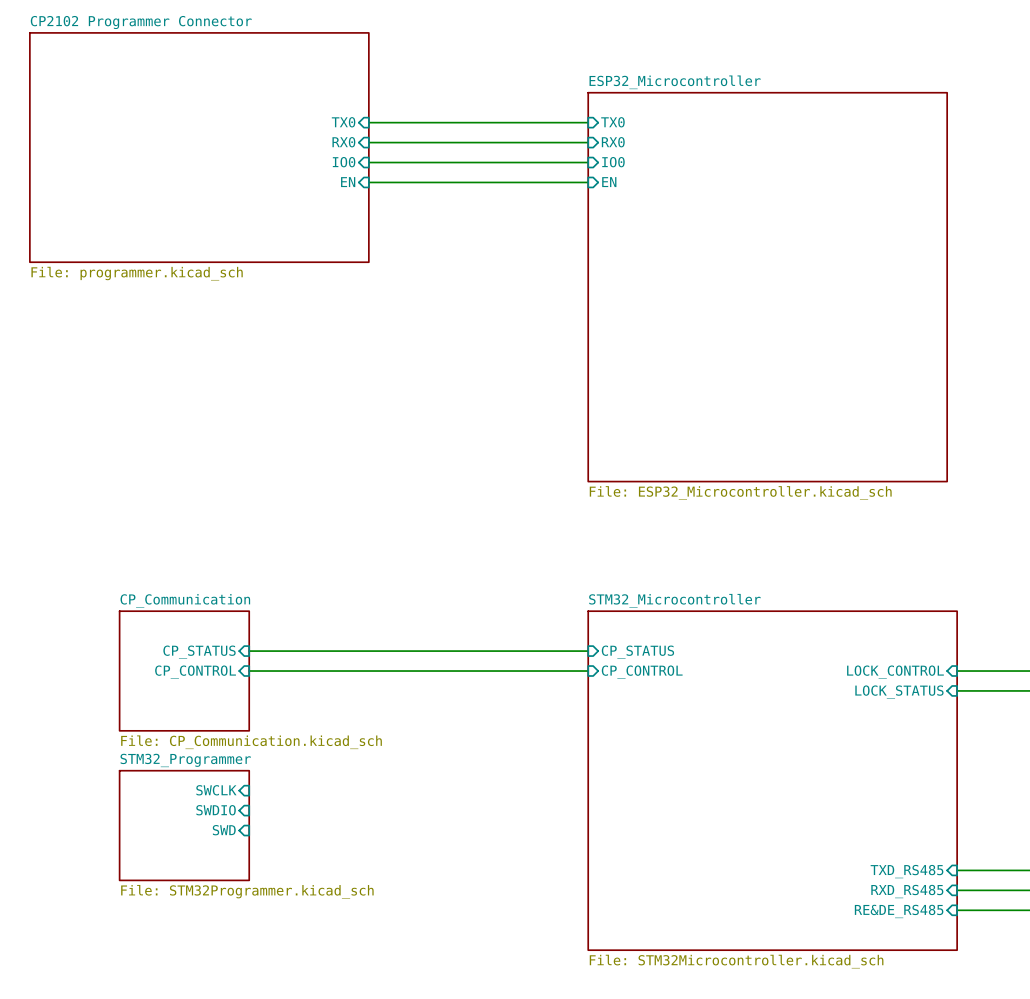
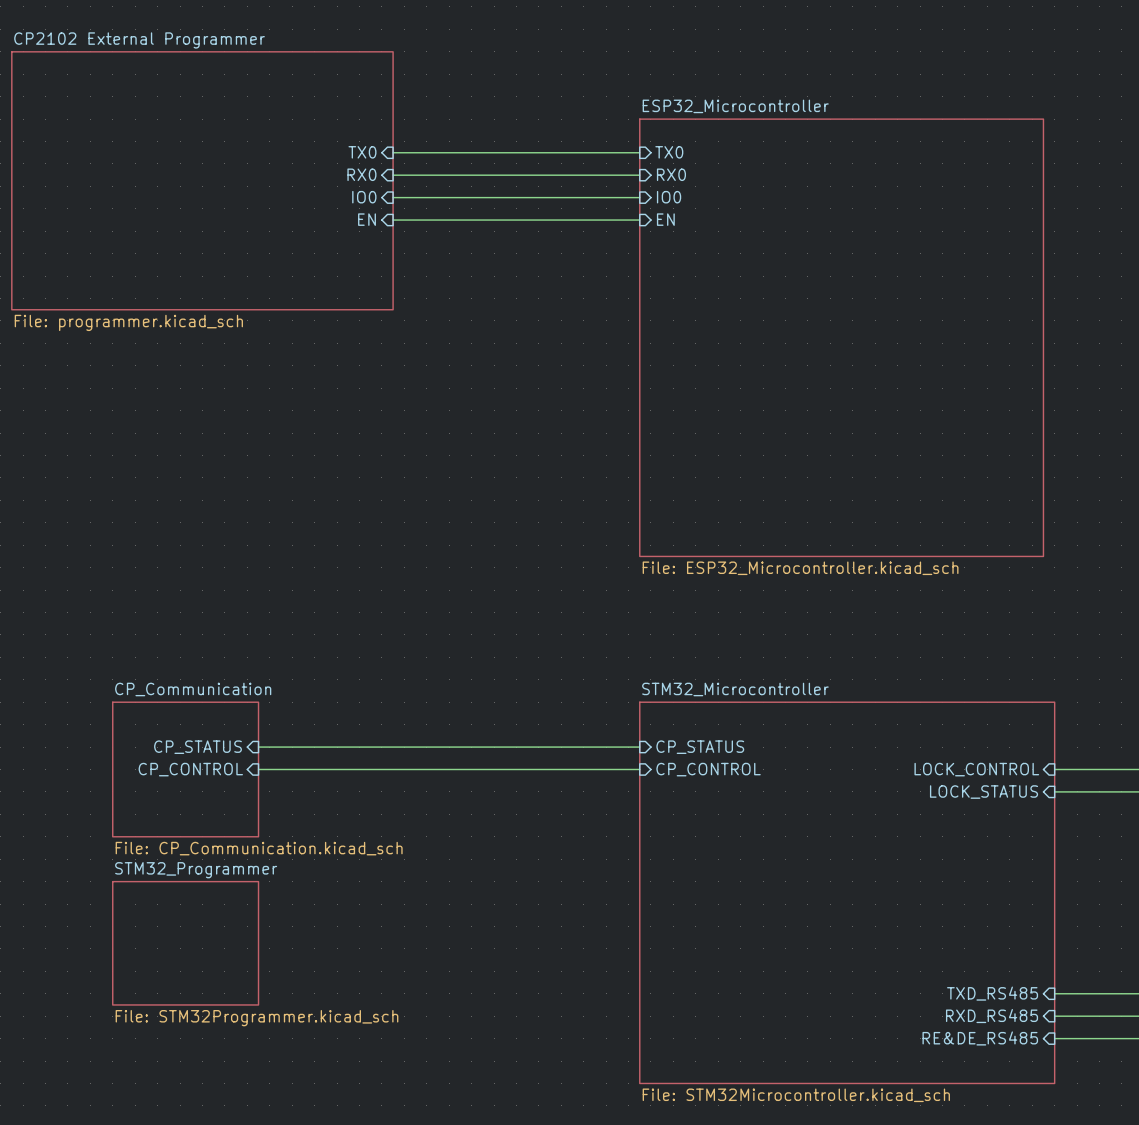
sheet CP2102 Programmer Connector name: CP2102 Programmer Connector (141, 22) -> CP2102 External Programmer (139, 40)
sheet pin: SWCLK (216, 790) -> none
sheet pin: SWDIO (216, 810) -> none
sheet pin: SWD (224, 830) -> none

